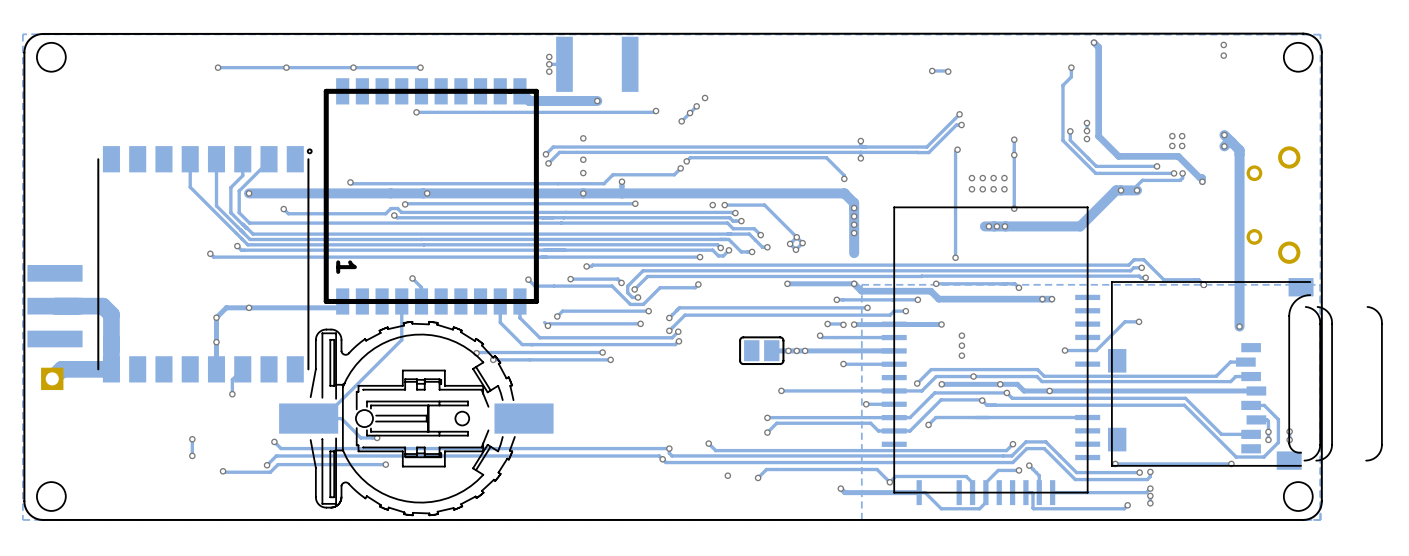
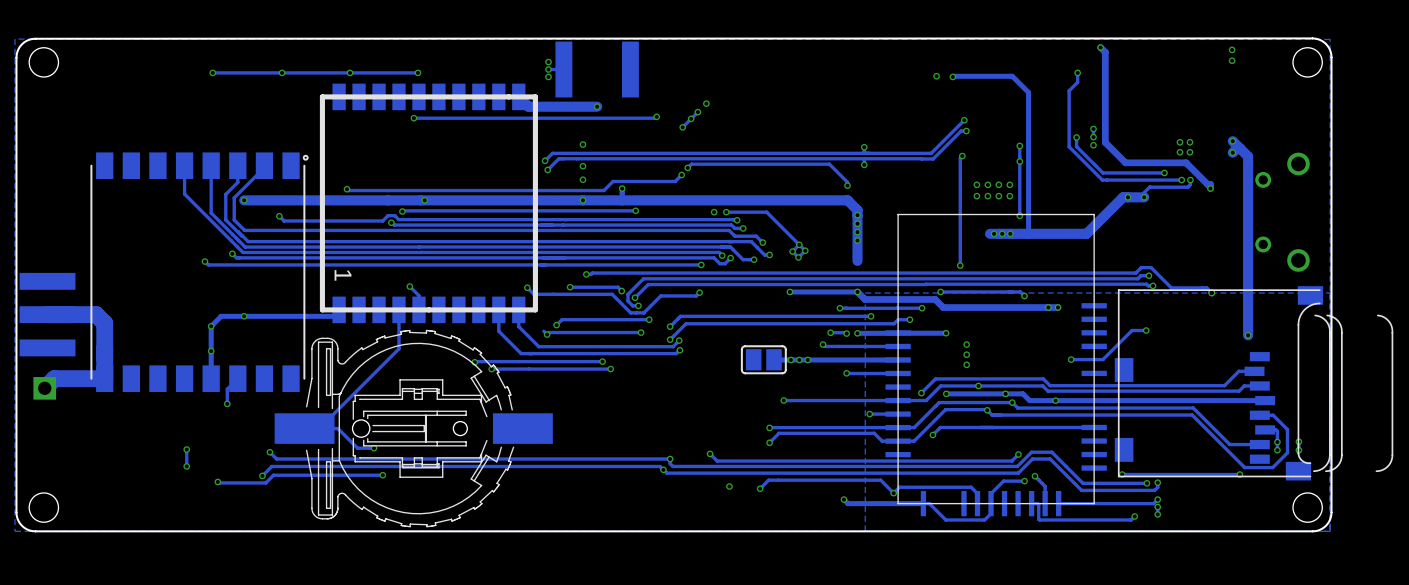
track: (932, 70) (948, 71) -> none
track: none -> (953, 76) (1012, 76) (1028, 92) (1028, 233)

